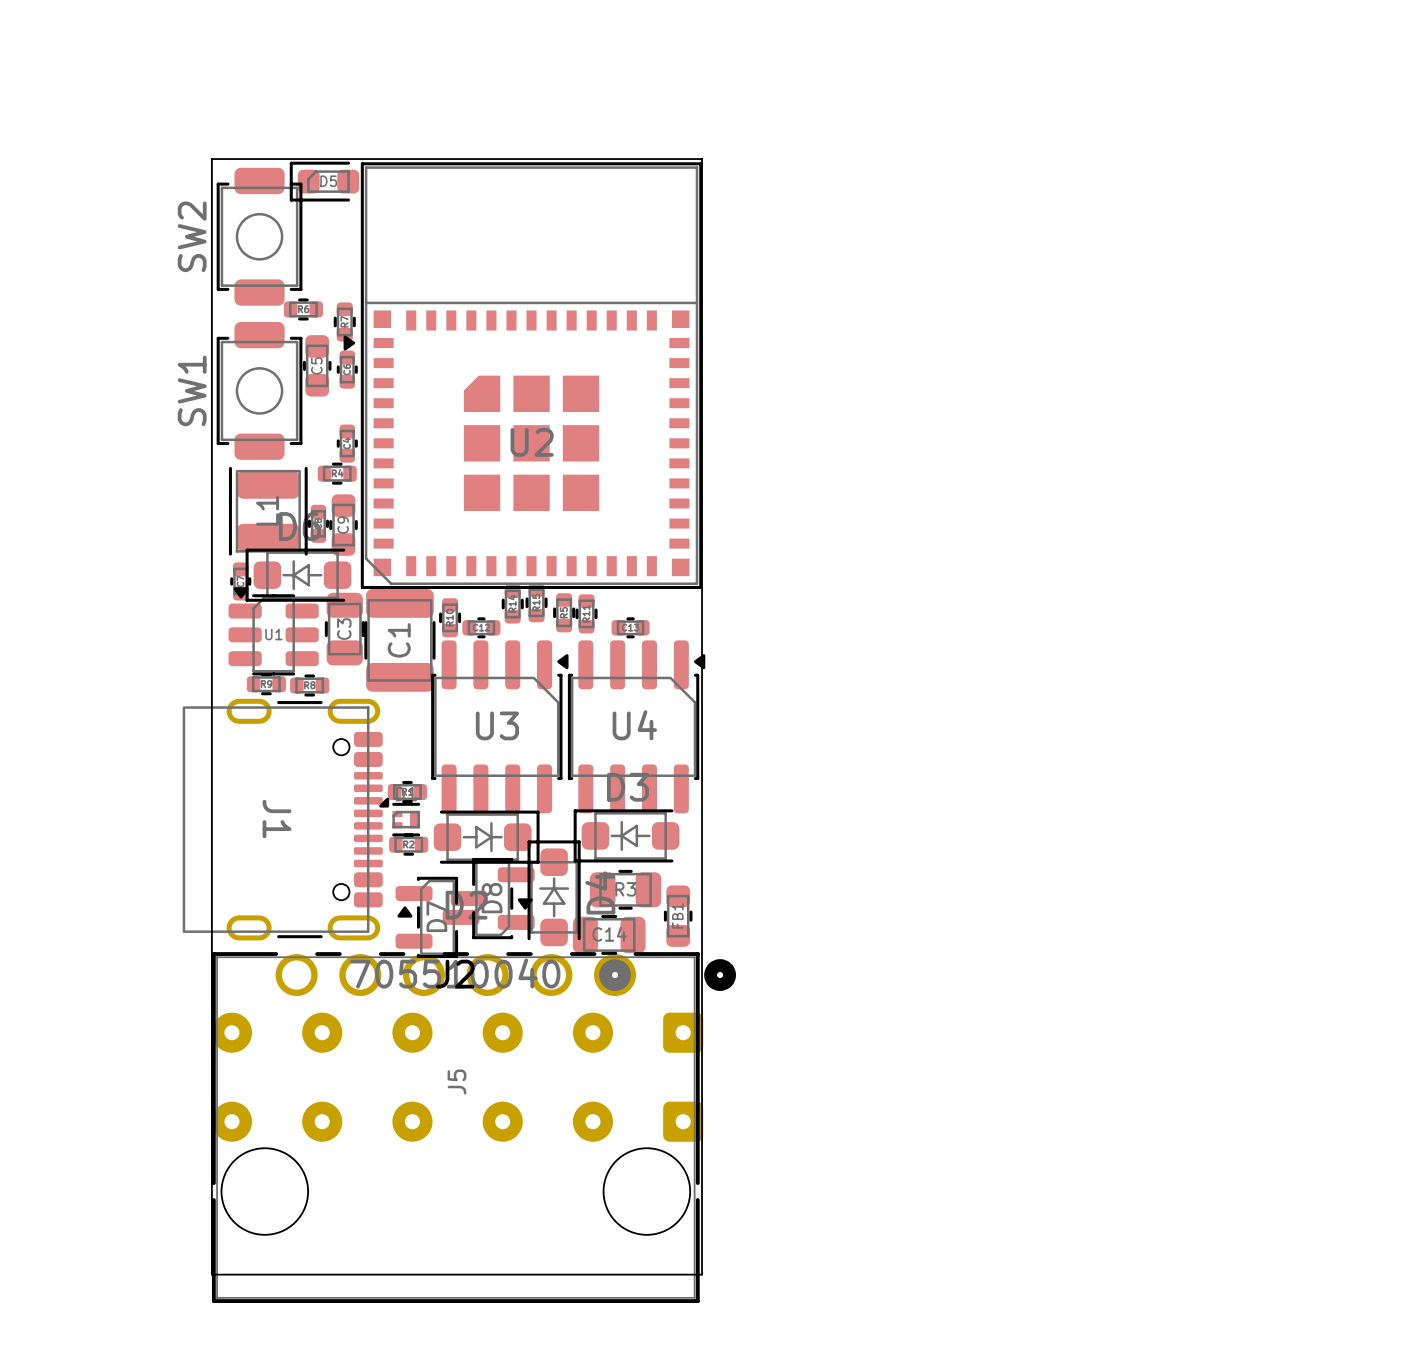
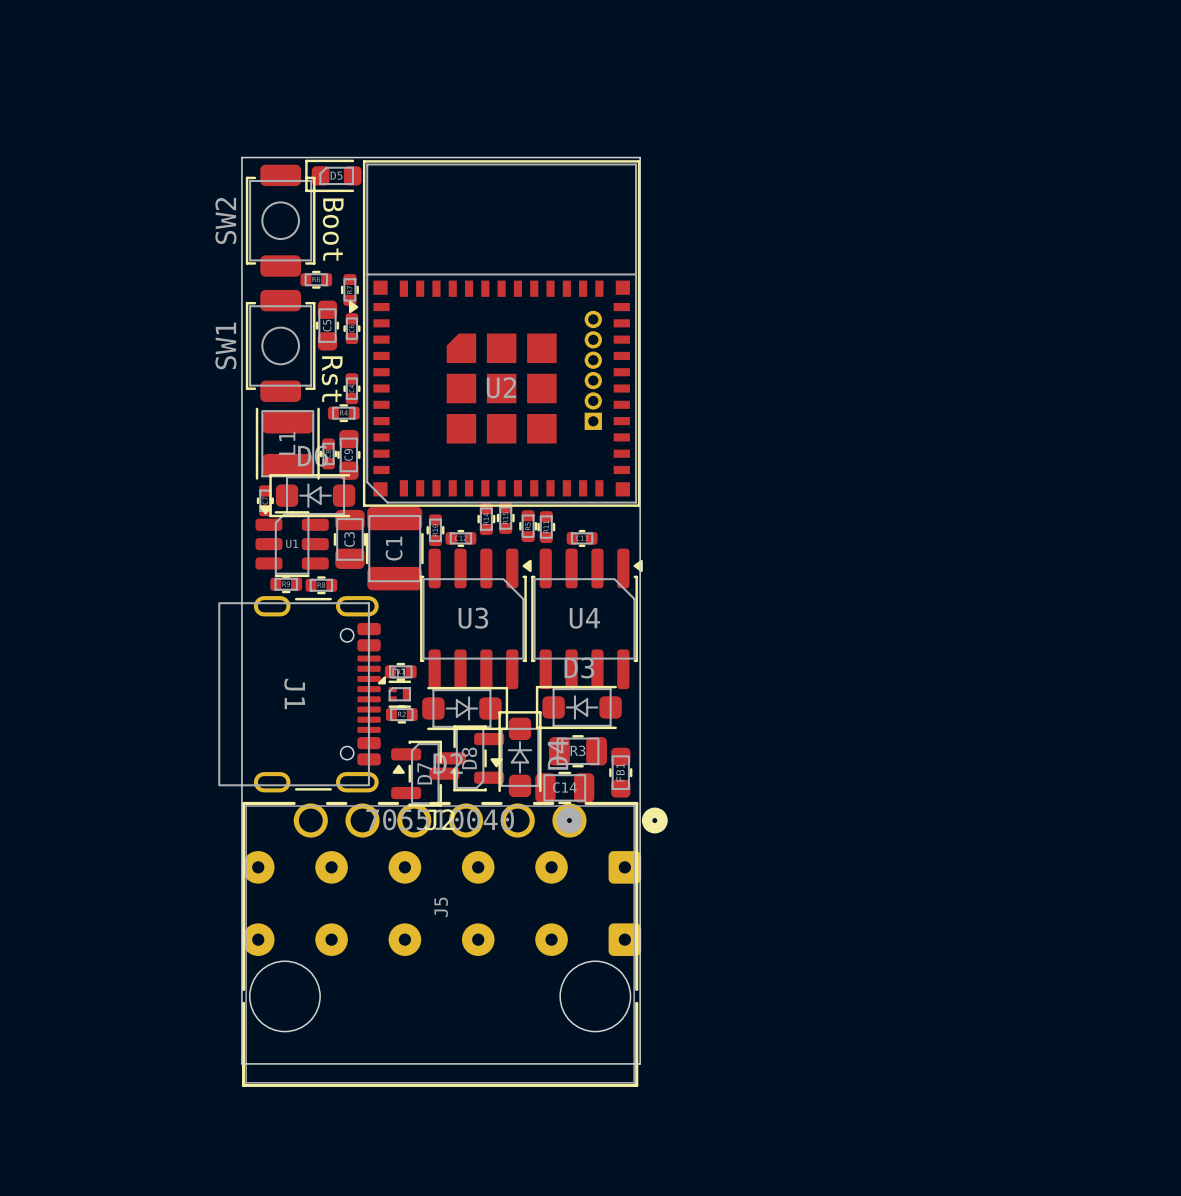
SW2 value: none -> Boot (333, 229)
part: none -> (593, 370)
SW1 value: none -> Rst (332, 379)

